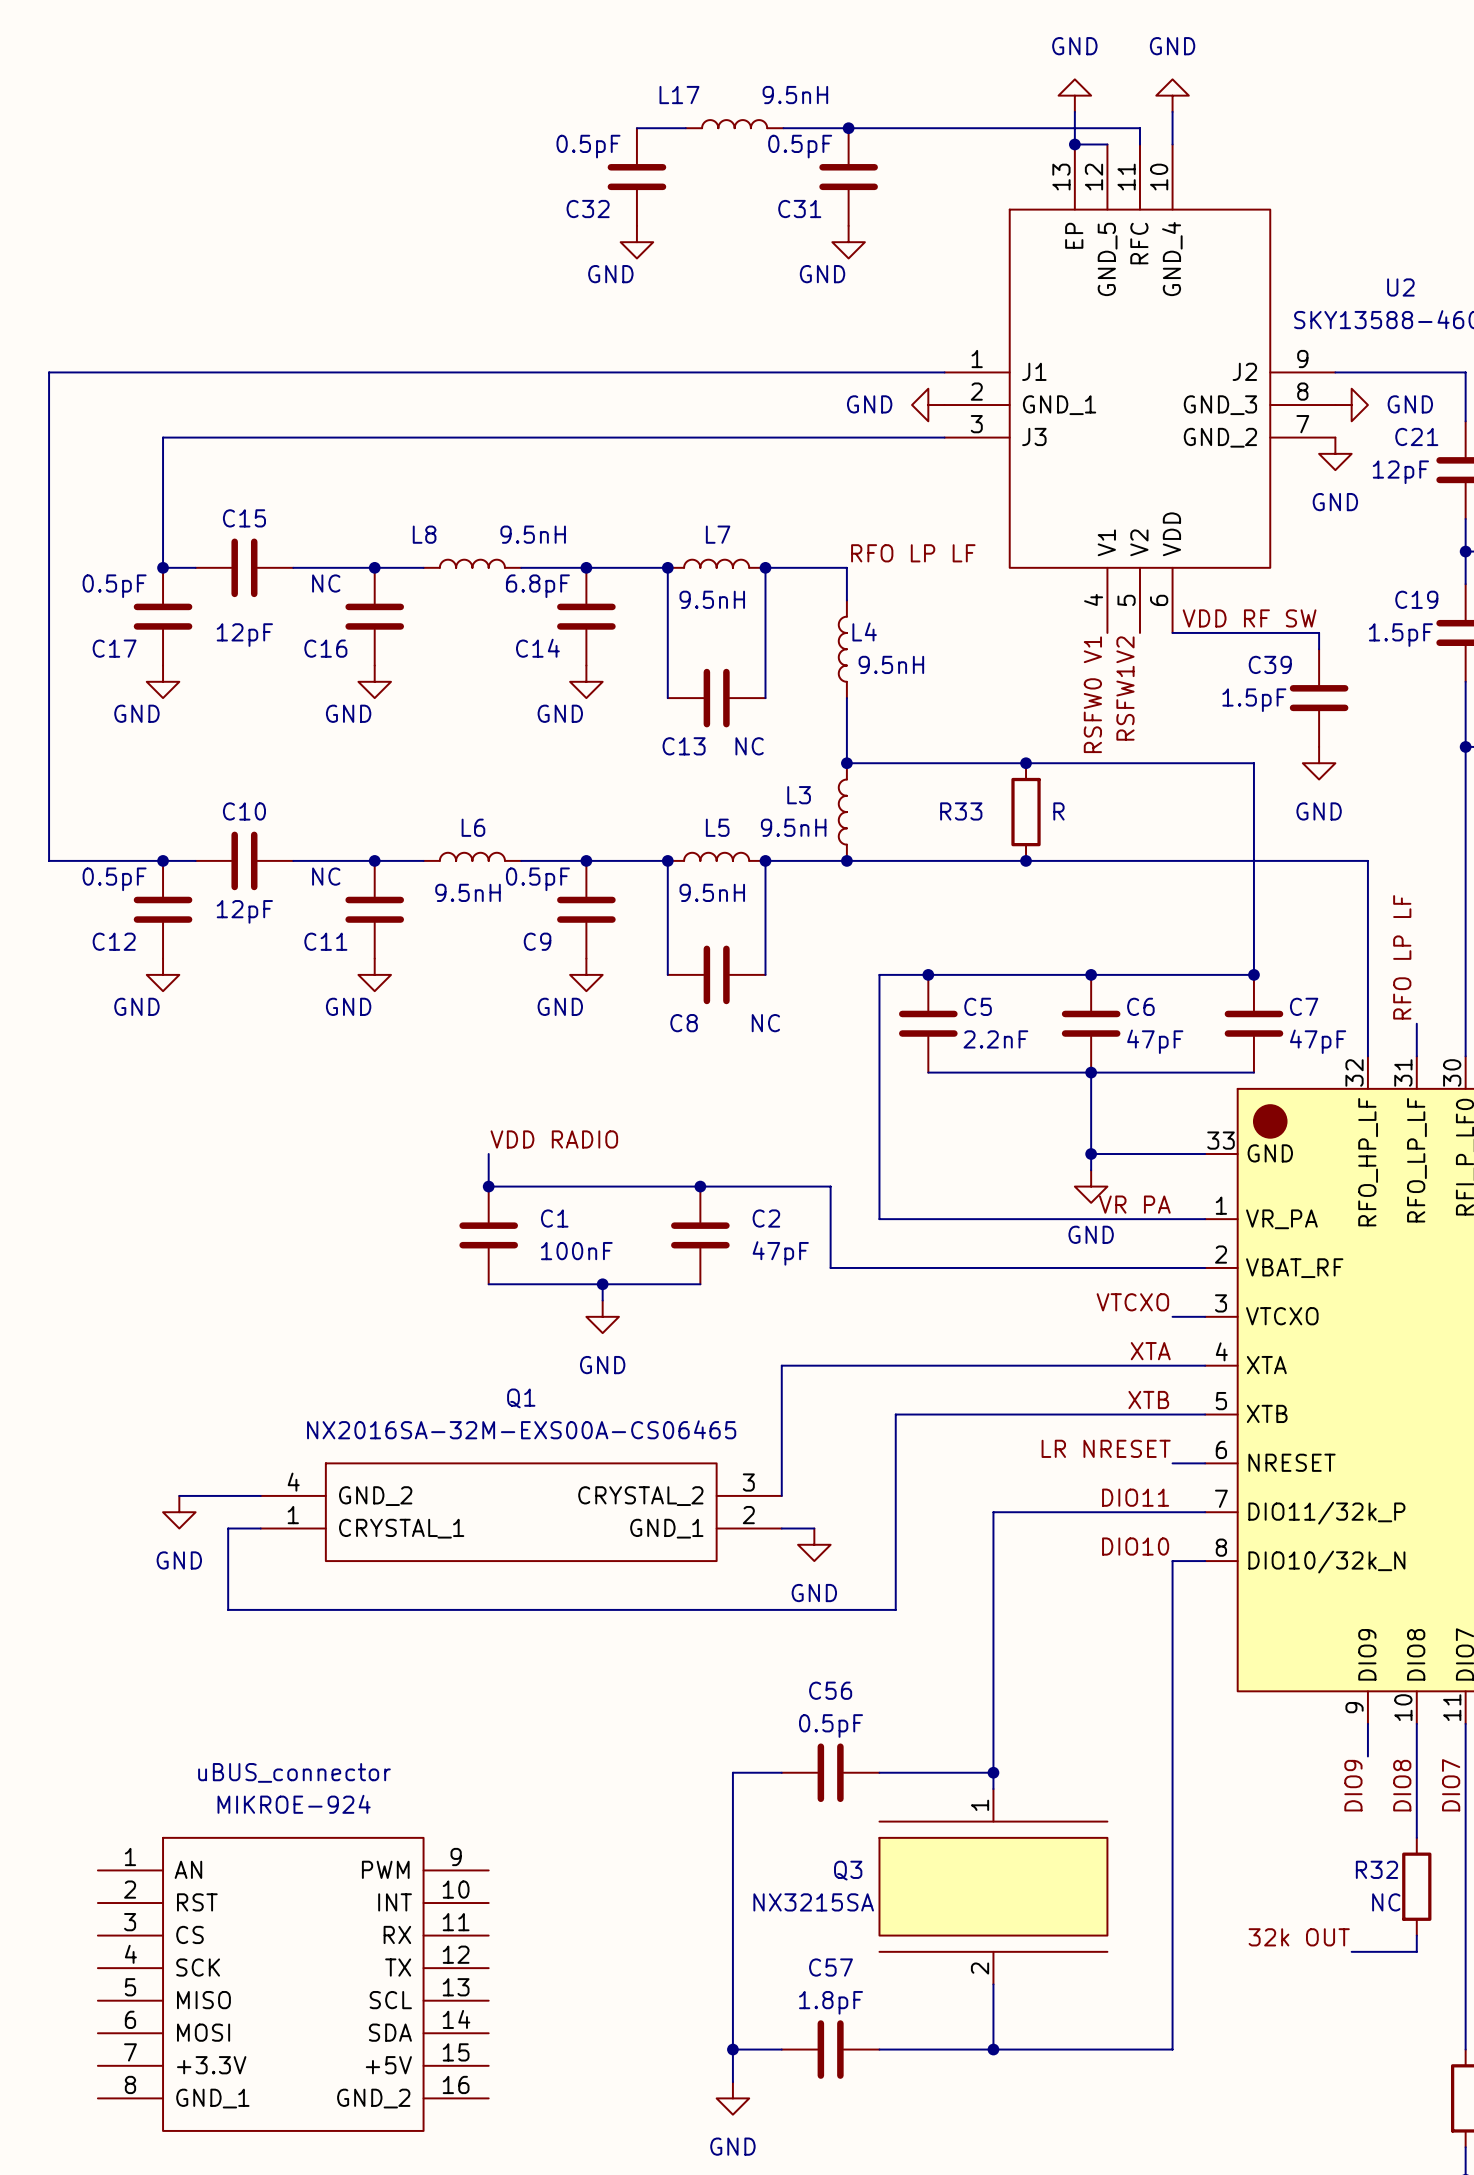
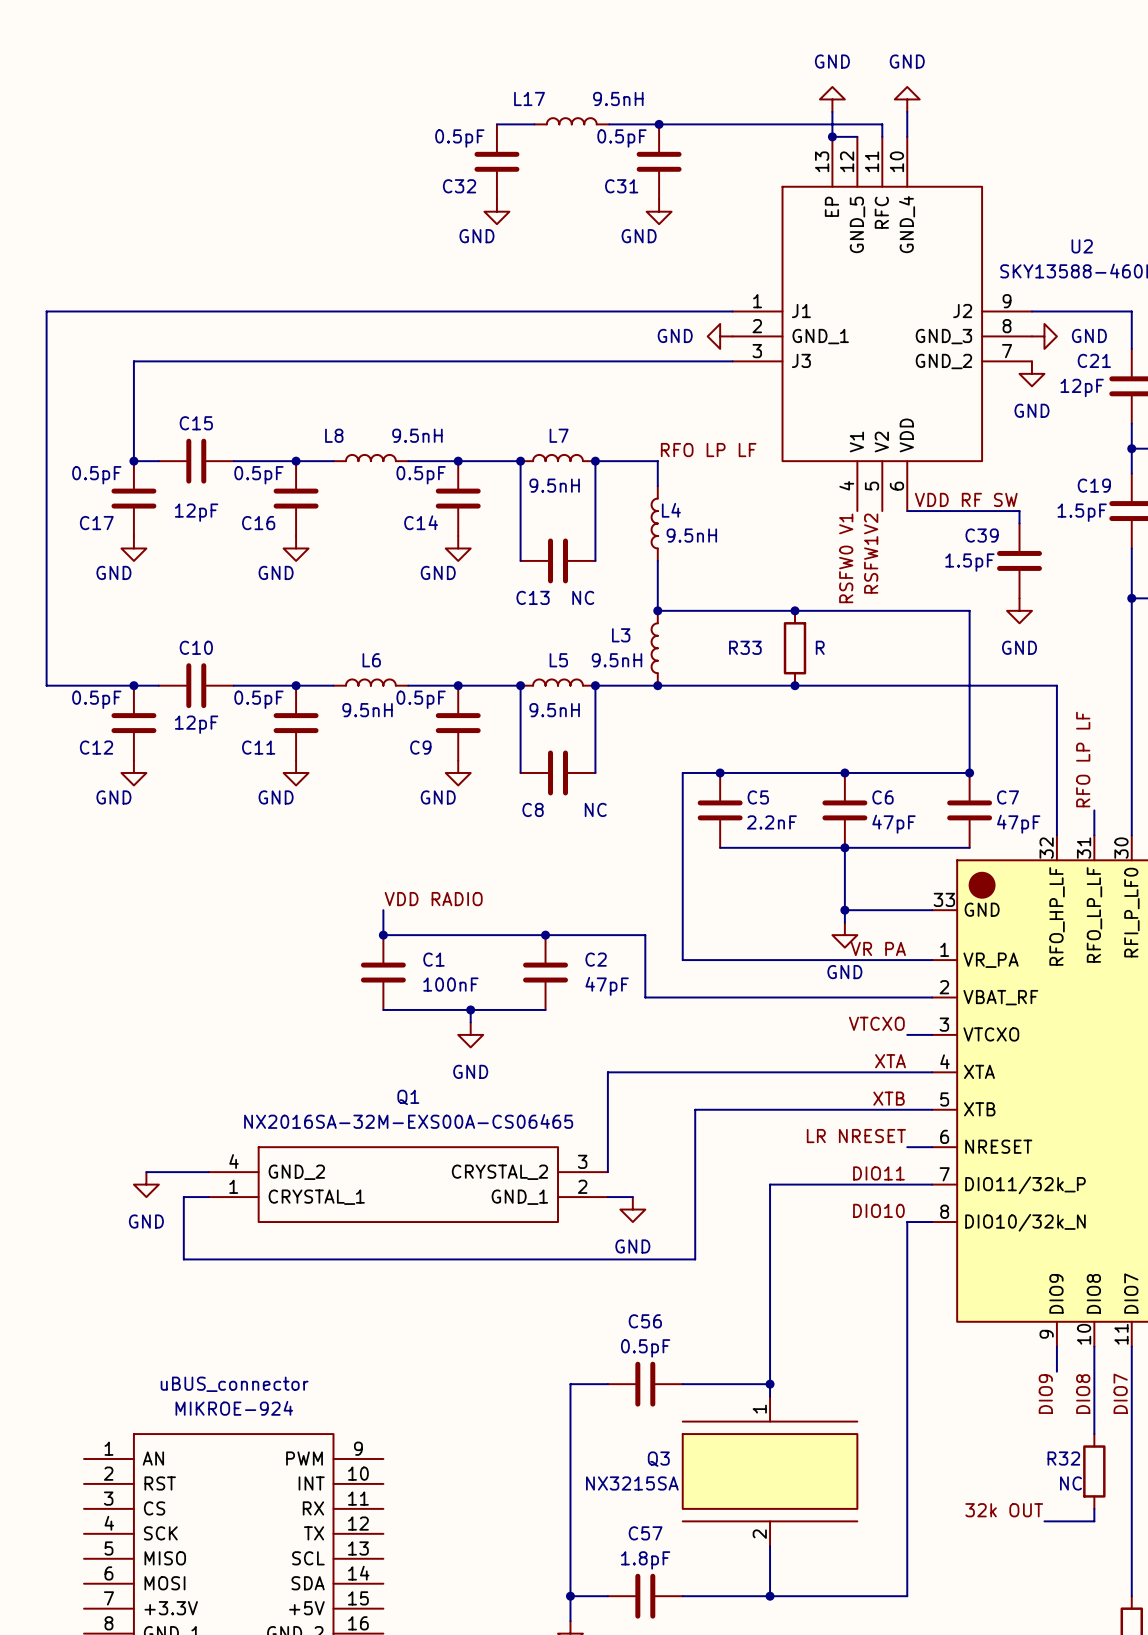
C16 value: NC (326, 583) -> 0.5pF (258, 475)
C14 value: 6.8pF (537, 586) -> 0.5pF (421, 475)
C11 value: NC (326, 876) -> 0.5pF (258, 699)

